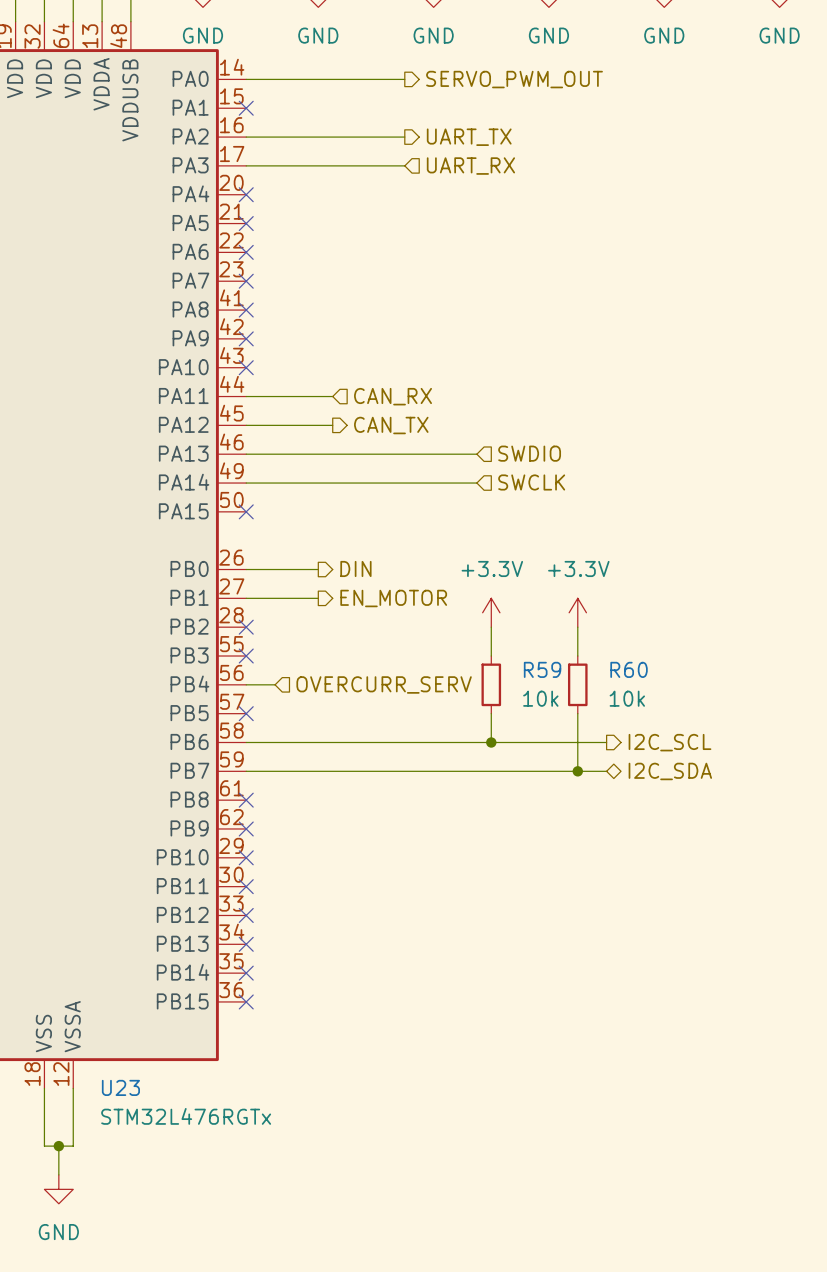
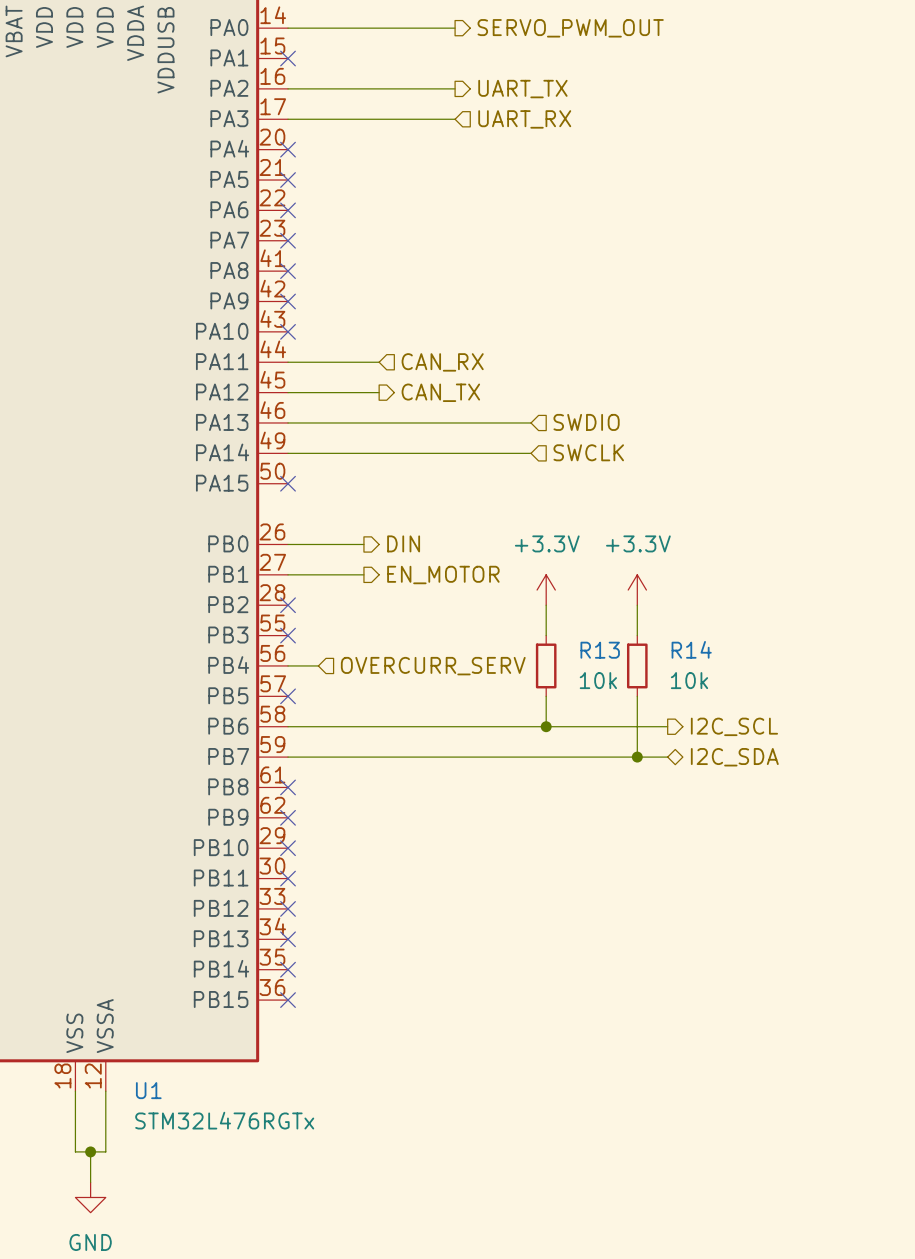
R59 name: R59 (542, 669) -> R13 (600, 650)
R60 name: R60 (629, 669) -> R14 (691, 649)
U23 name: U23 (120, 1087) -> U1 (148, 1090)

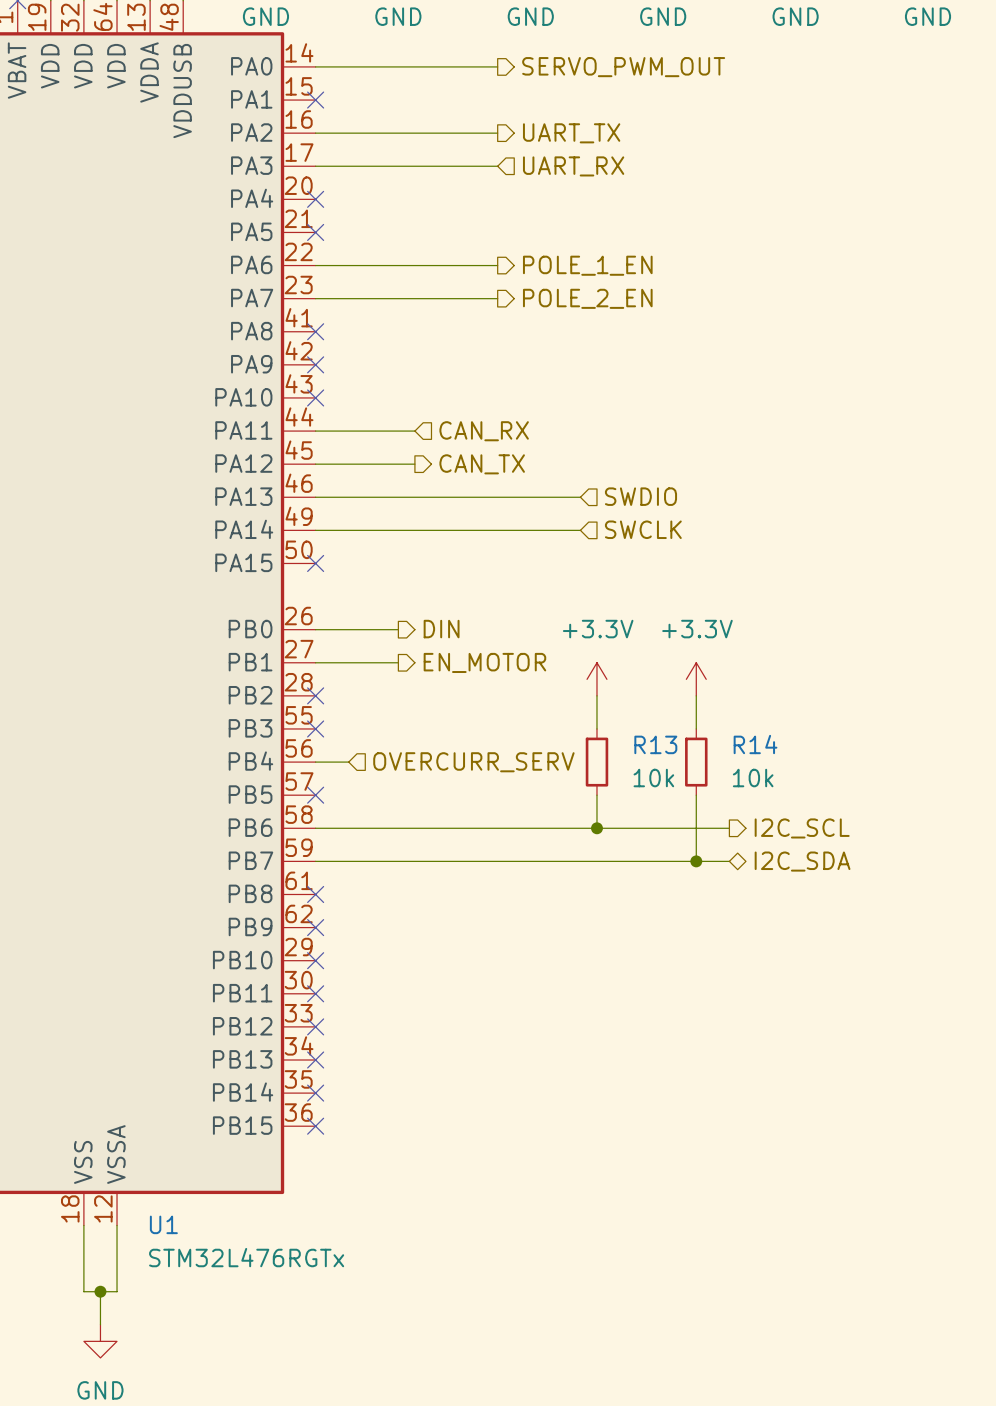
wire: none -> (315, 265) (497, 265)
no-connect mark: (288, 210) -> none
hierarchical label: none -> POLE_1_EN (587, 265)
wire: none -> (315, 298) (497, 298)
no-connect mark: (288, 240) -> none
hierarchical label: none -> POLE_2_EN (587, 298)

